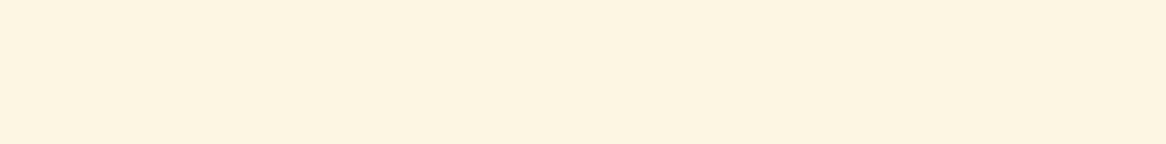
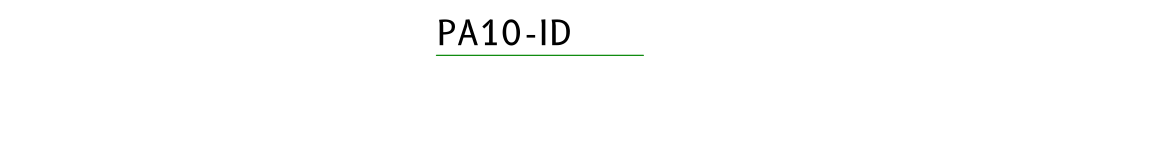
label: none -> PA10-ID (504, 32)
wire: none -> (436, 55) (643, 55)

